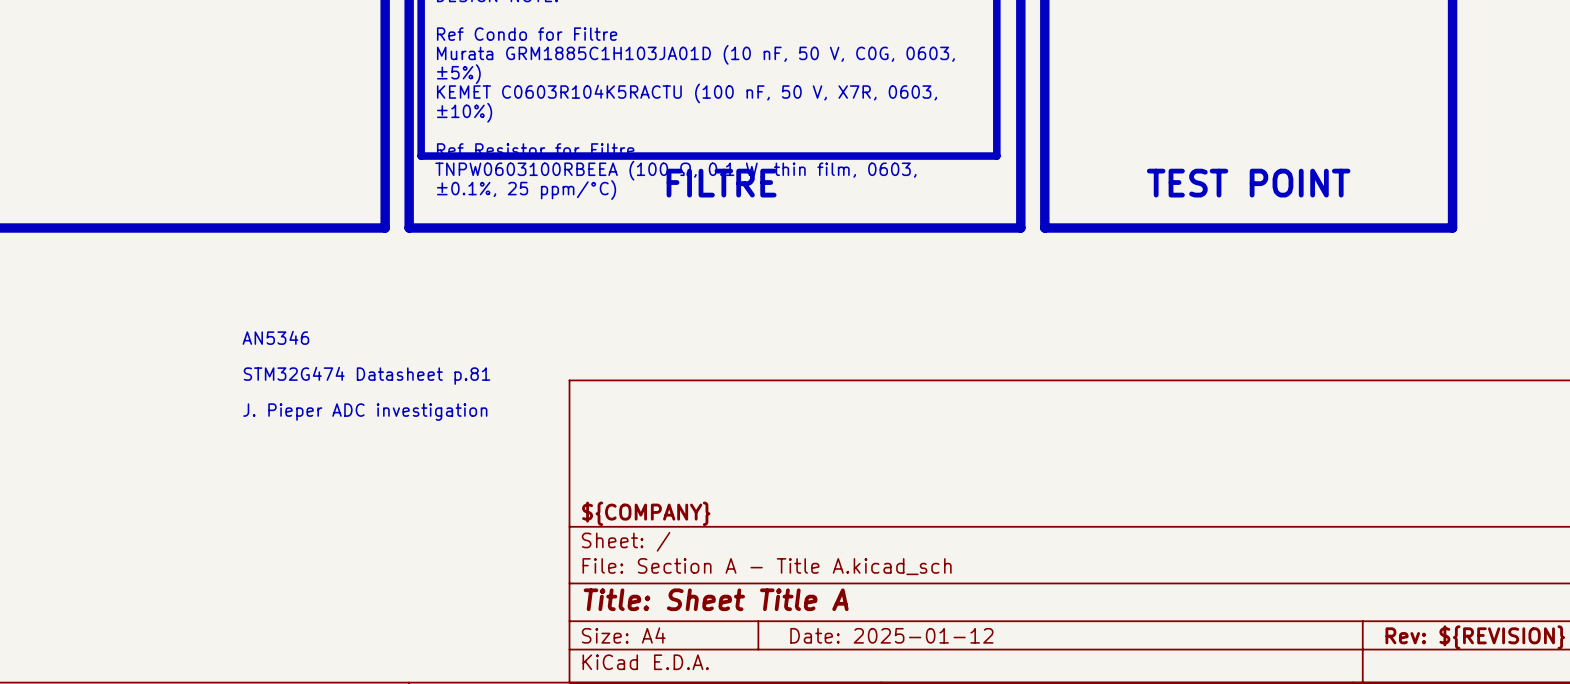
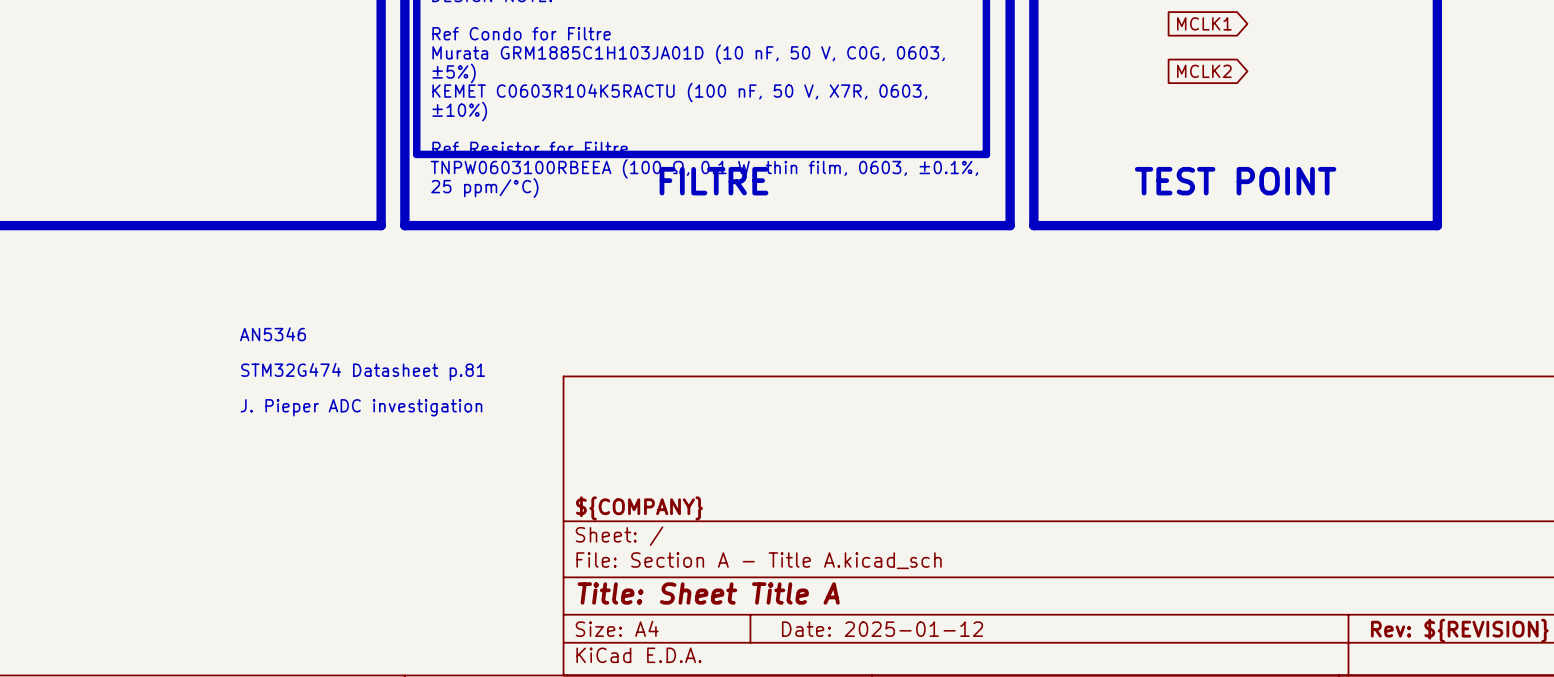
global label: none -> MCLK1 (1204, 23)
global label: none -> MCLK2 (1204, 71)
text: TNPW0603100RBEEA (100 Ω, 0.1 W, thin film, 0603, (675, 170) -> TNPW0603100RBEEA (100 Ω, 0.1 W, thin film, 0603, ±0.1%, (704, 168)
text: ±0.1%, 25 ppm/°C) (526, 190) -> 25 ppm/°C) (484, 188)

